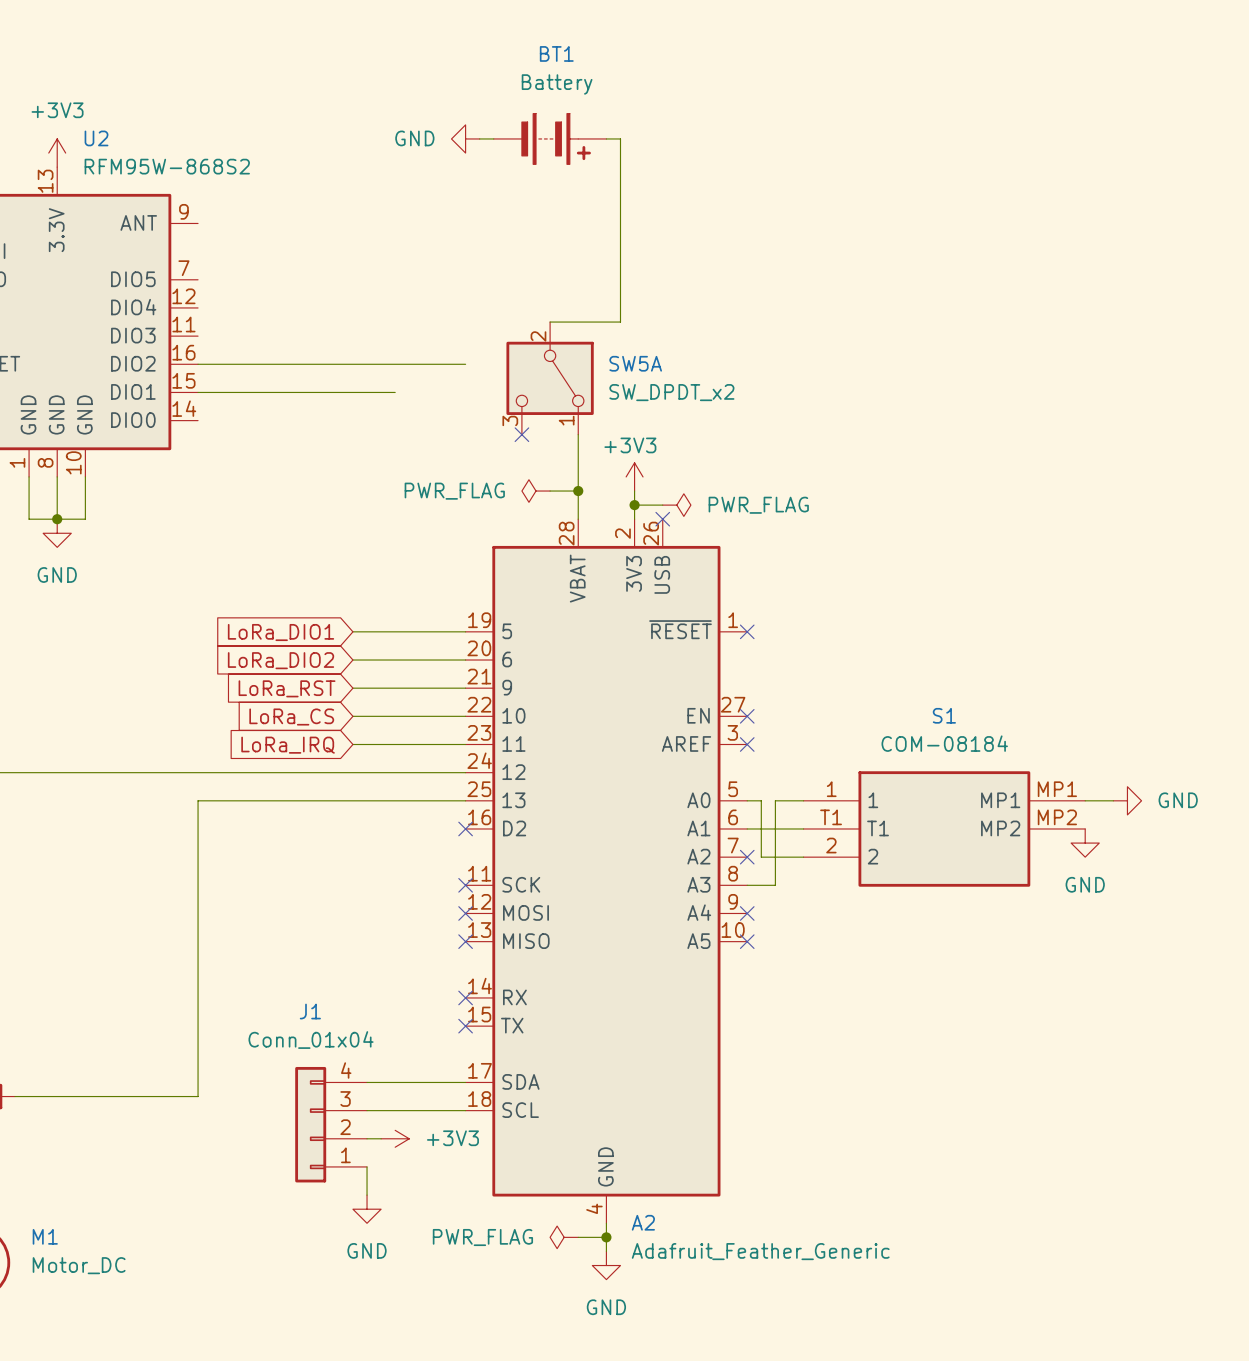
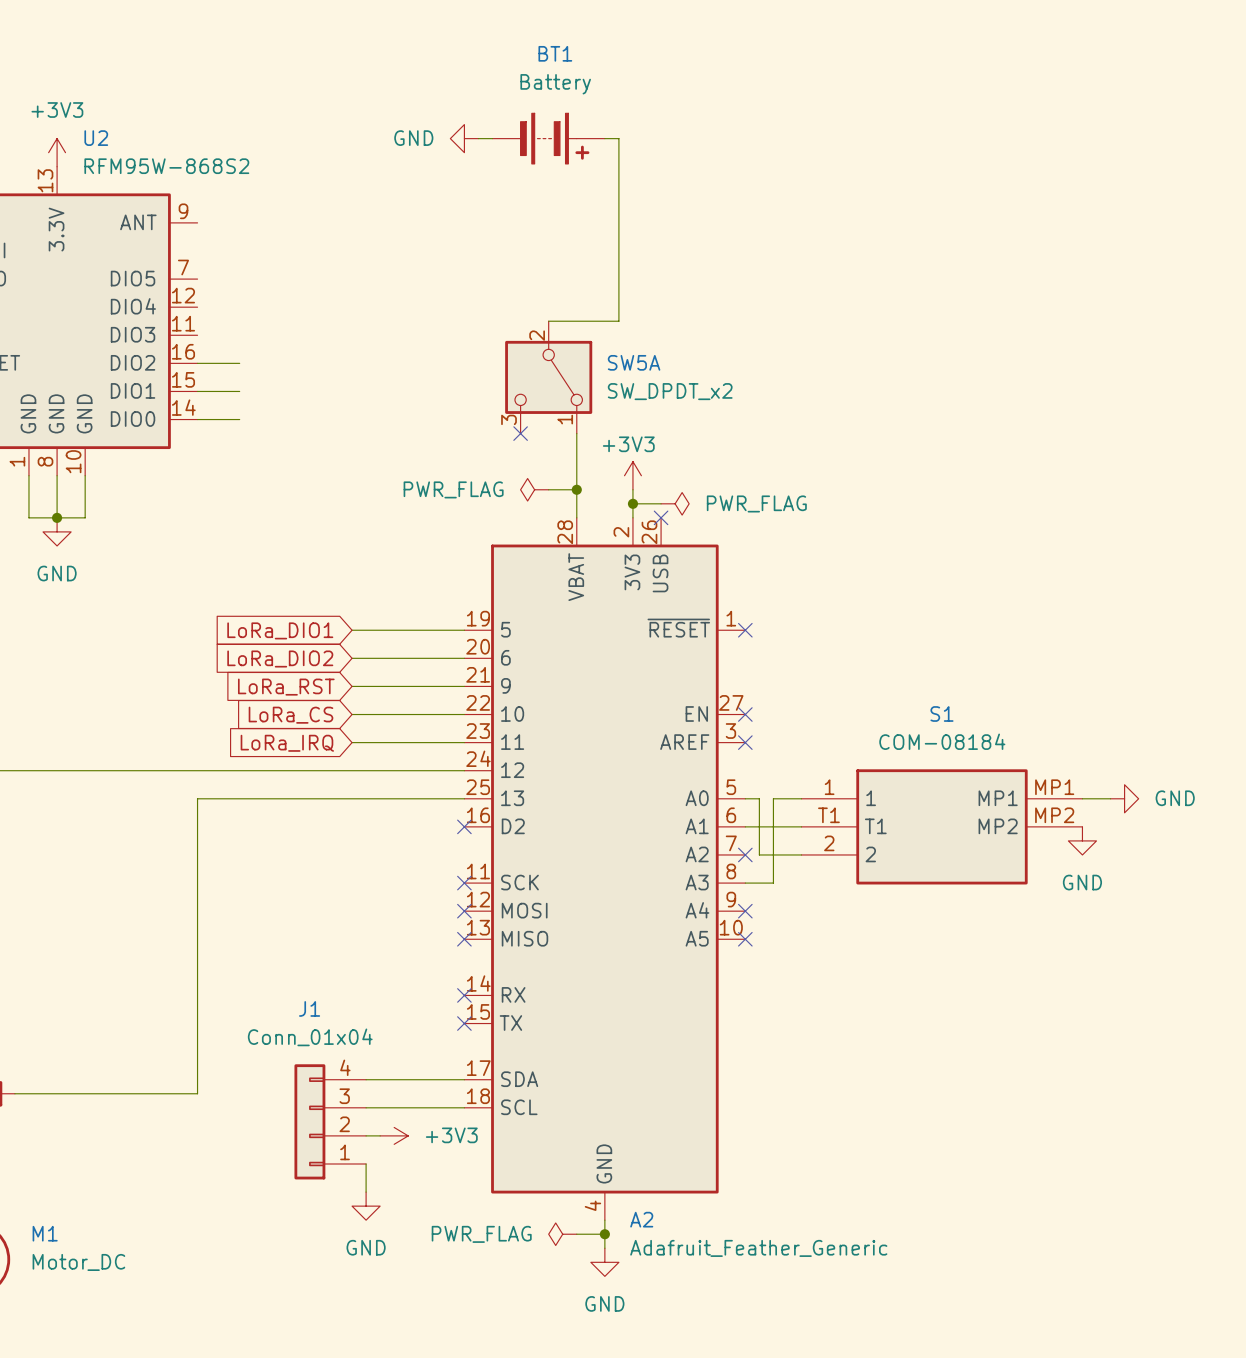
wire: (240, 364) (465, 364) -> none
wire: (240, 392) (395, 392) -> none
wire: none -> (197, 419) (239, 419)

